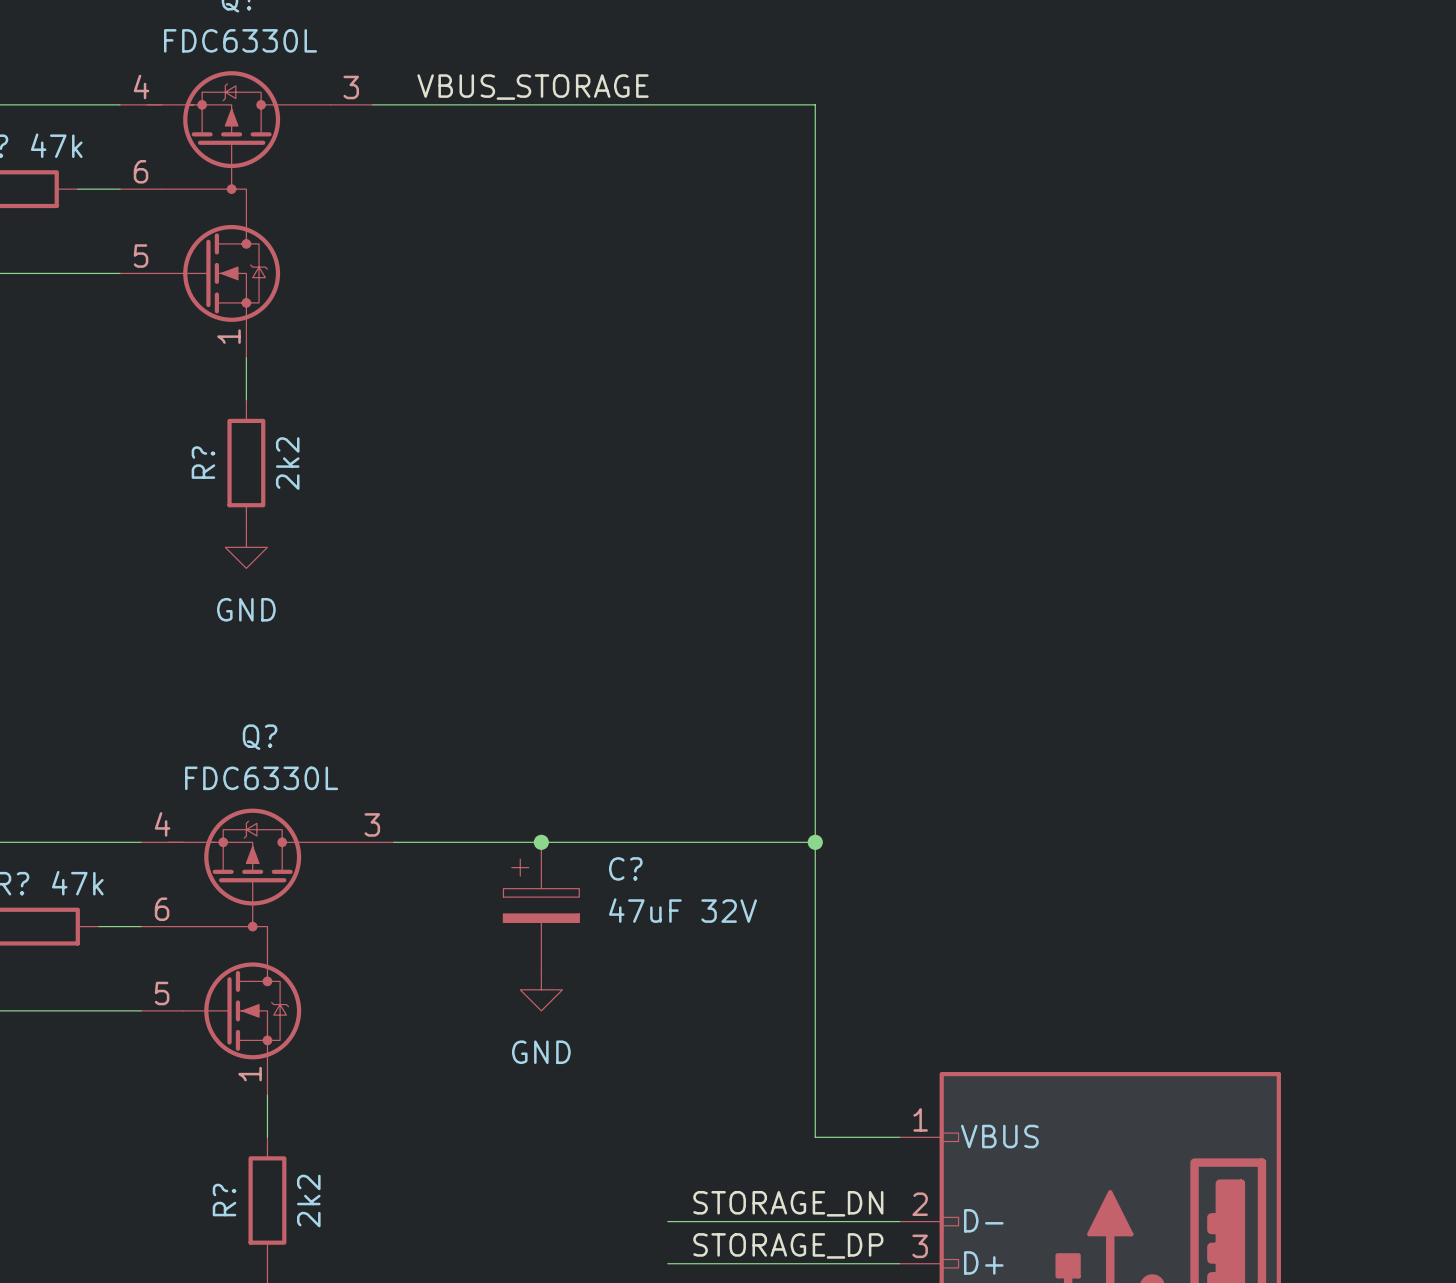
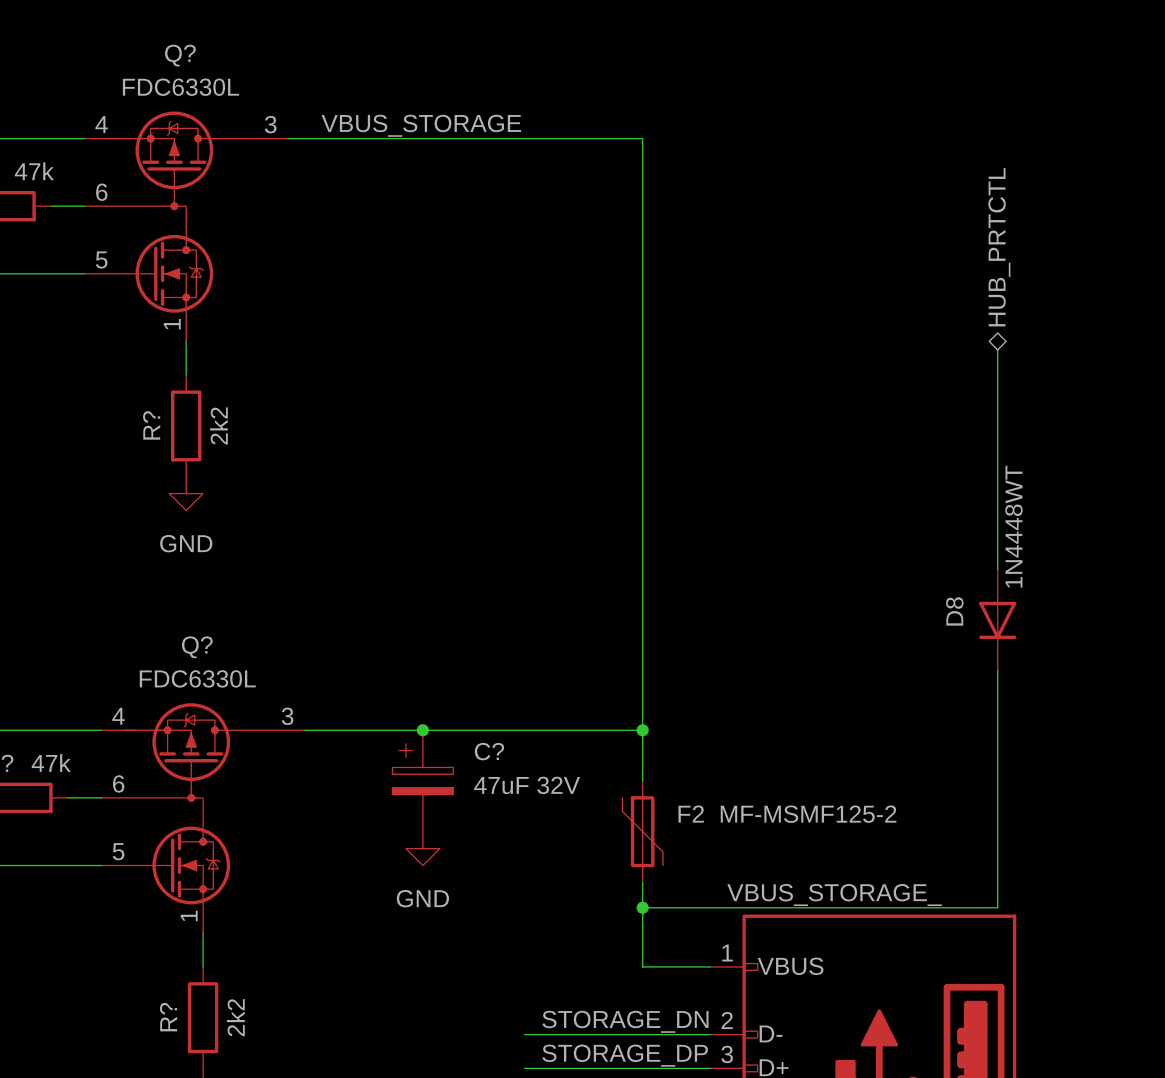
hierarchical label: none -> HUB_PRTCTL (999, 247)
wire: none -> (997, 349) (997, 569)
D8: none -> 1N4448WT (997, 620)
wire: none -> (997, 671) (997, 907) (642, 907)
F2: none -> MF-MSMF125-2 (642, 831)
label: none -> VBUS_STORAGE_ (834, 895)
junction: none -> (642, 907)

